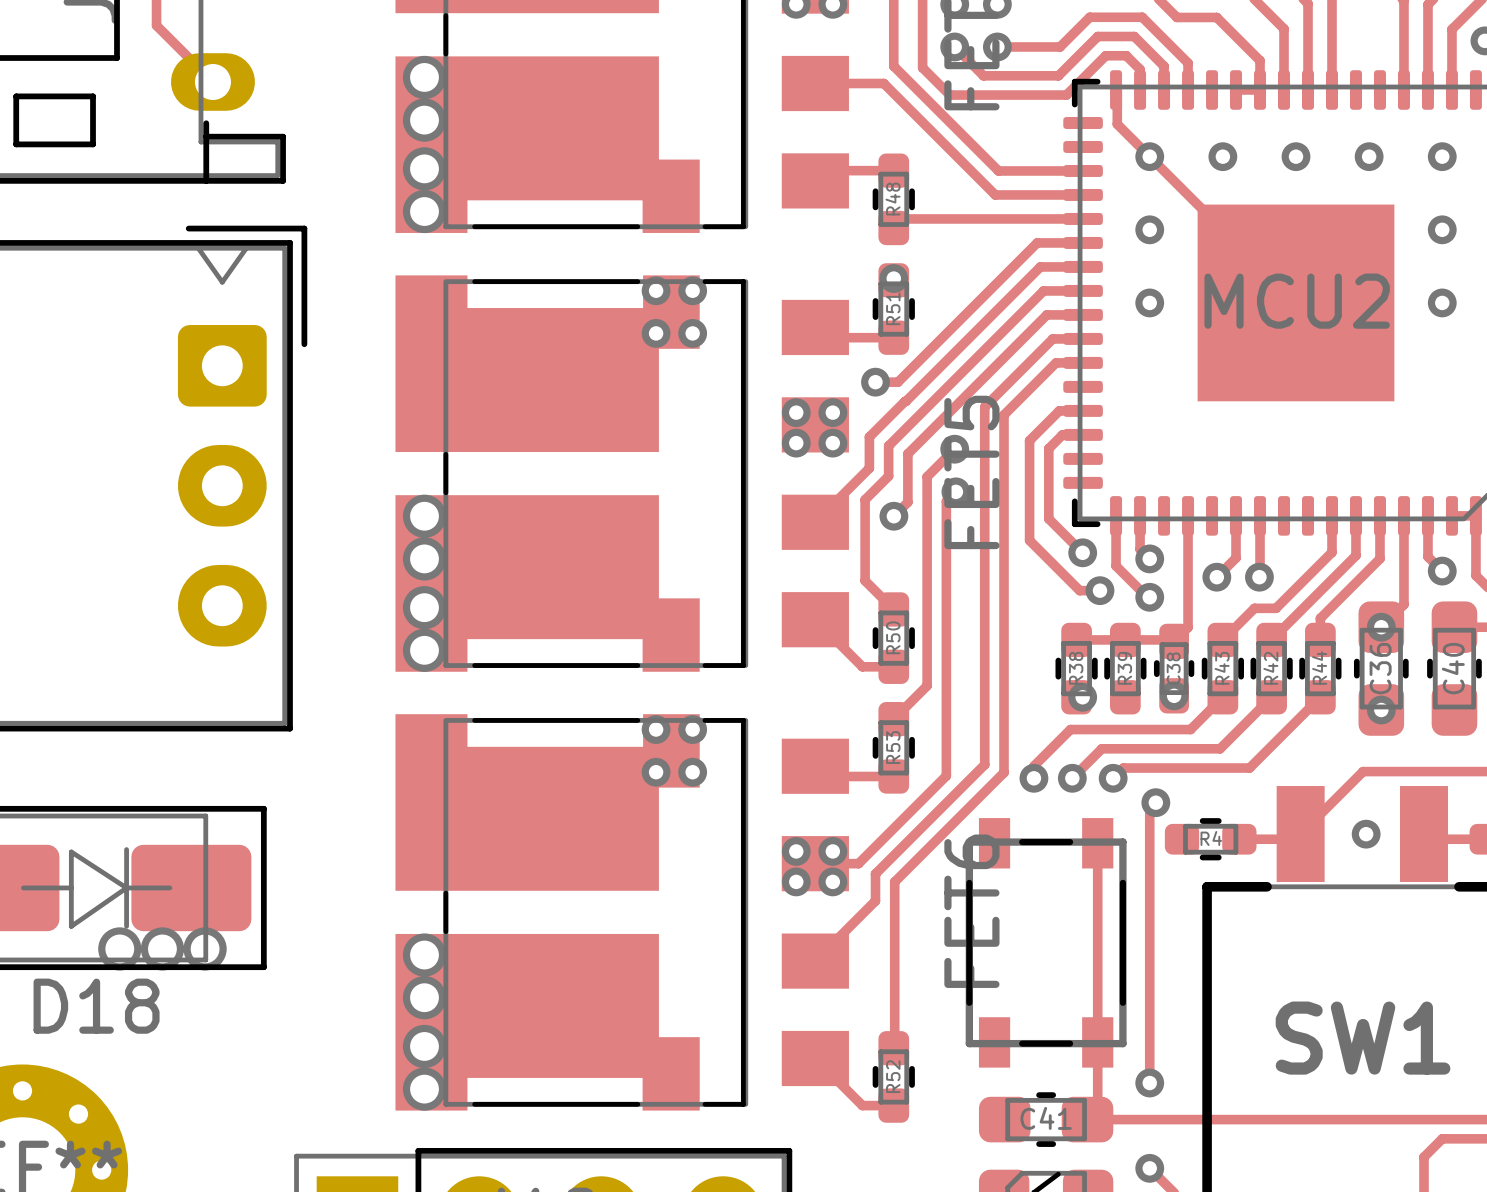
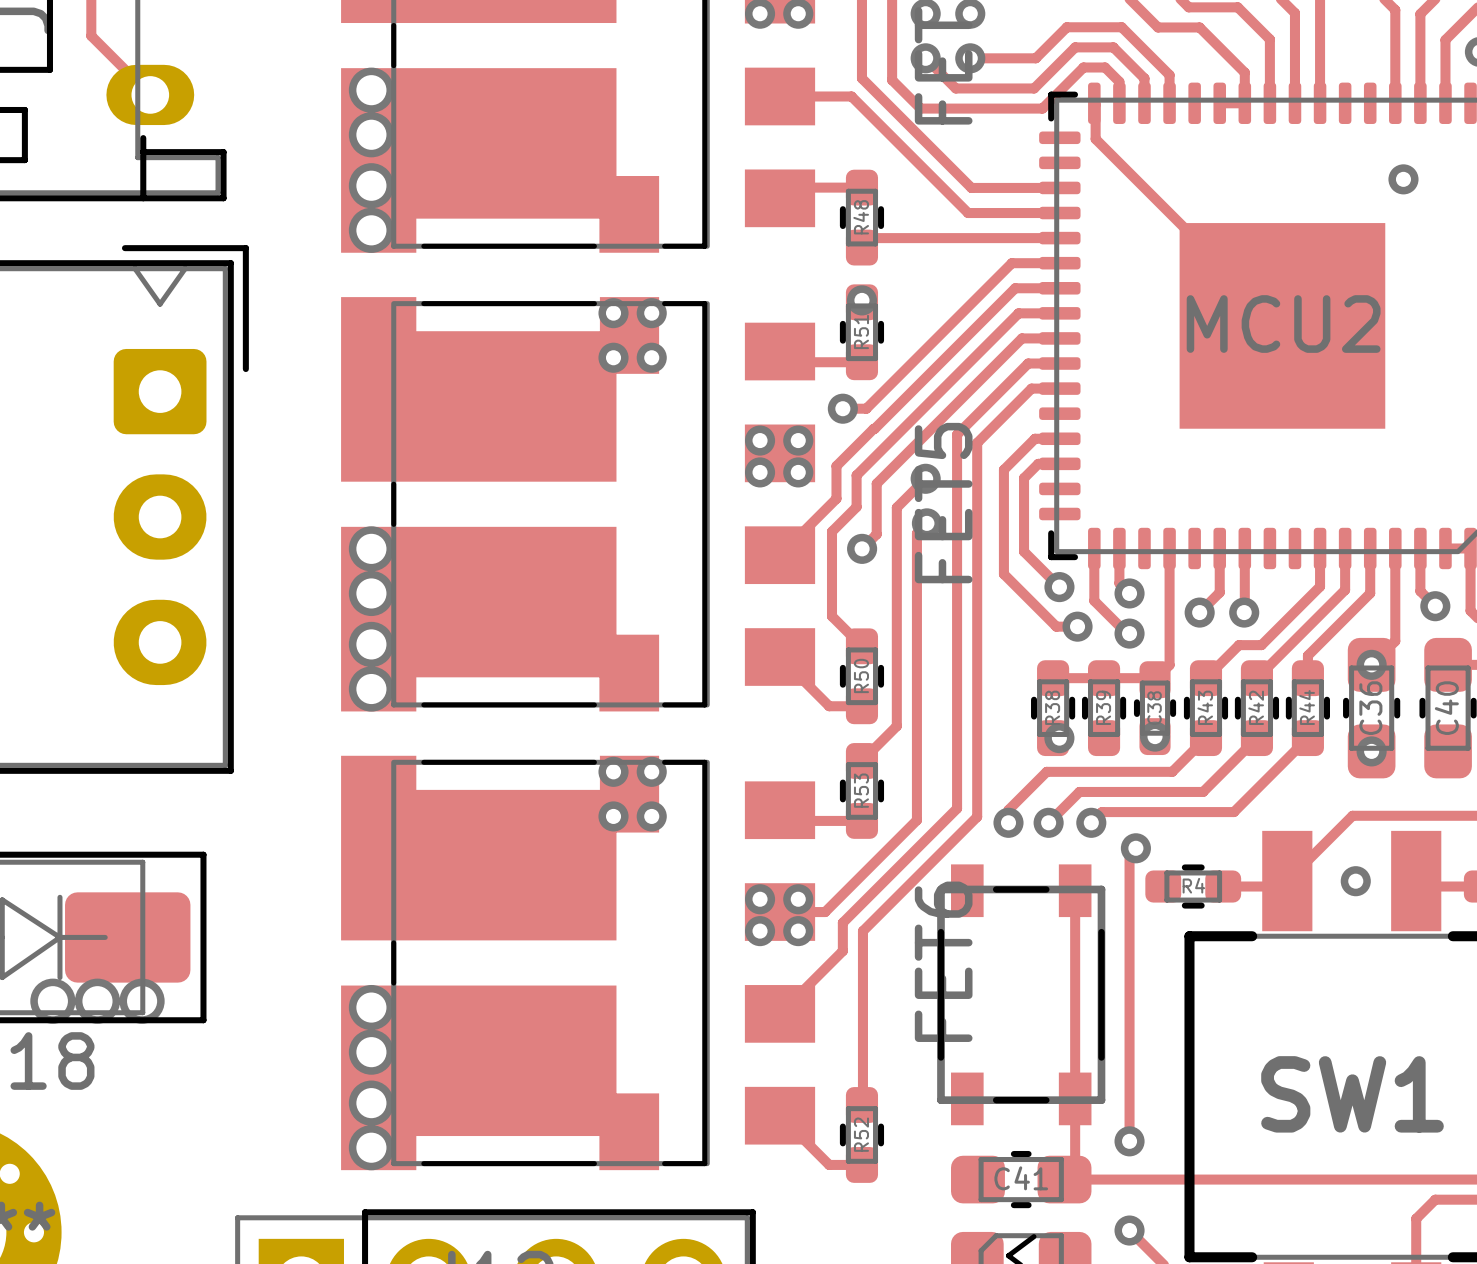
via: (1149, 156) -> none
via: (1222, 156) -> none
via: (1296, 156) -> none
via: (1369, 156) -> none
via: (1442, 156) -> none
via: none -> (1403, 179)
via: (1149, 229) -> none
via: (1442, 229) -> none
via: (1149, 302) -> none
via: (1442, 302) -> none

